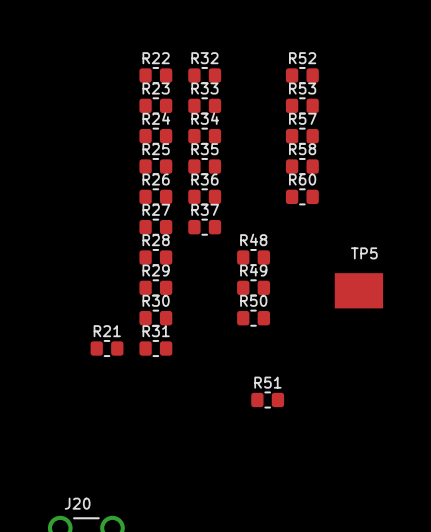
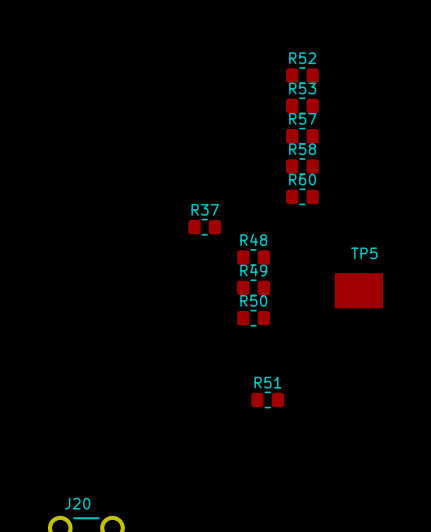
R22: (155, 75) -> none
R32: (204, 75) -> none
R23: (155, 105) -> none
R33: (204, 105) -> none
R24: (155, 136) -> none
R34: (204, 136) -> none
R25: (155, 166) -> none
R35: (204, 166) -> none
R26: (155, 196) -> none
R36: (204, 196) -> none
R27: (155, 227) -> none
R28: (155, 257) -> none
R29: (155, 287) -> none
R30: (155, 318) -> none
R21: (107, 348) -> none
R31: (155, 348) -> none

